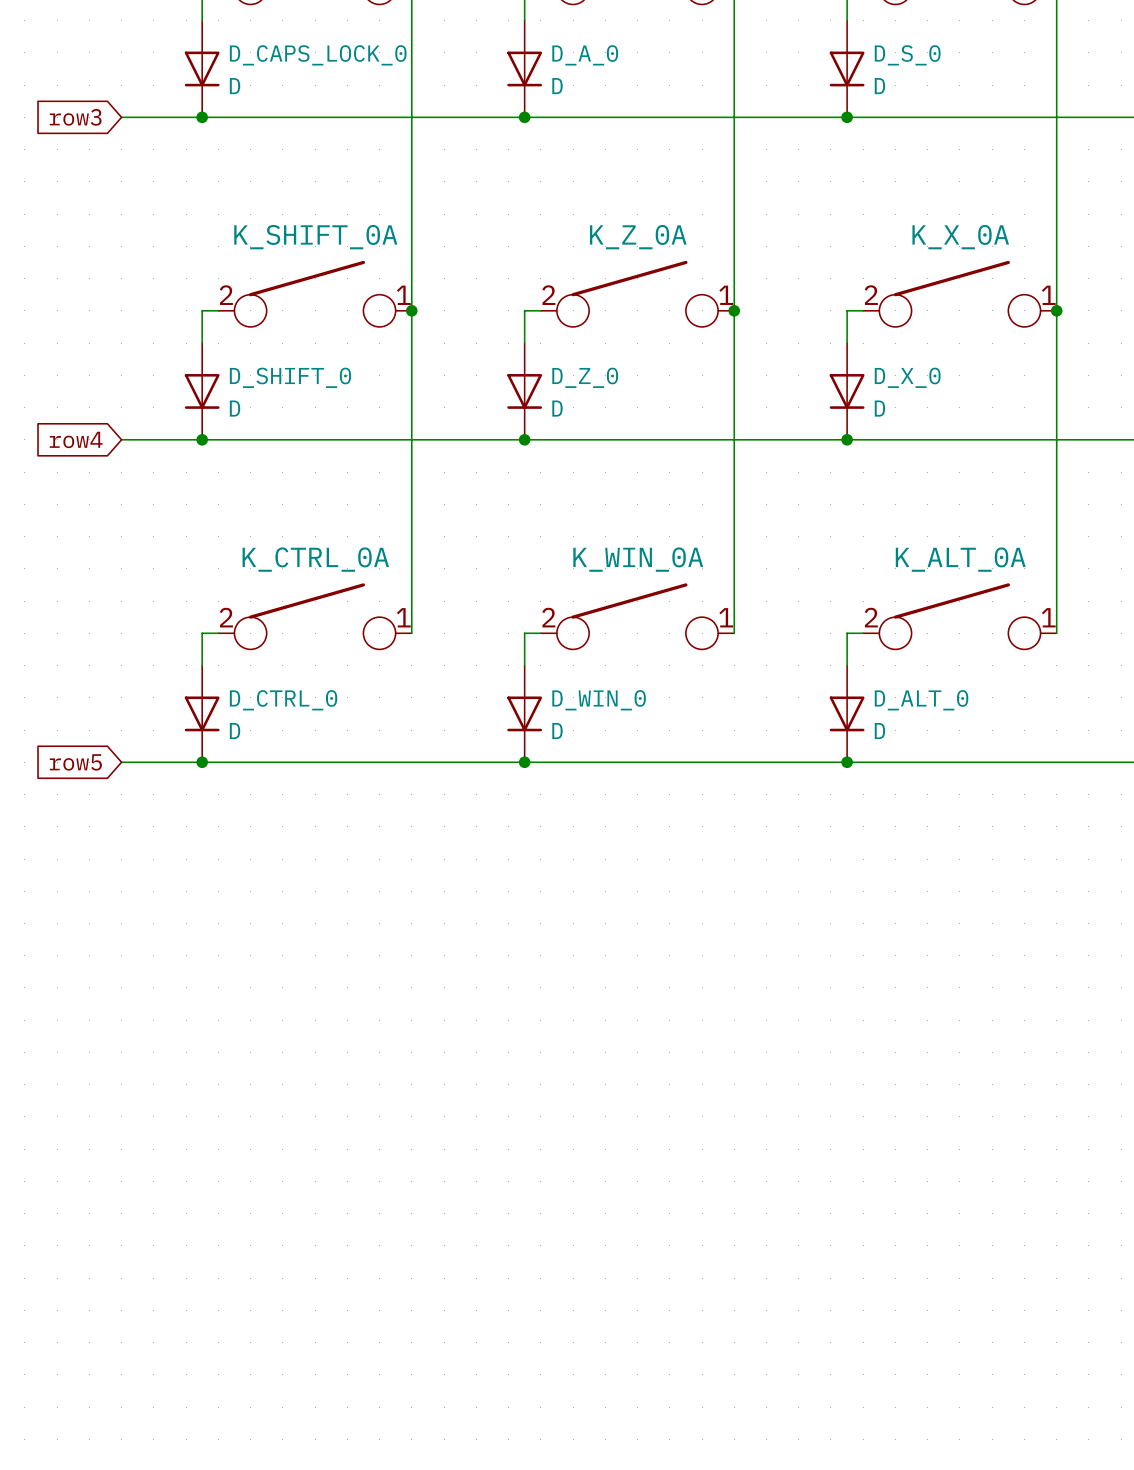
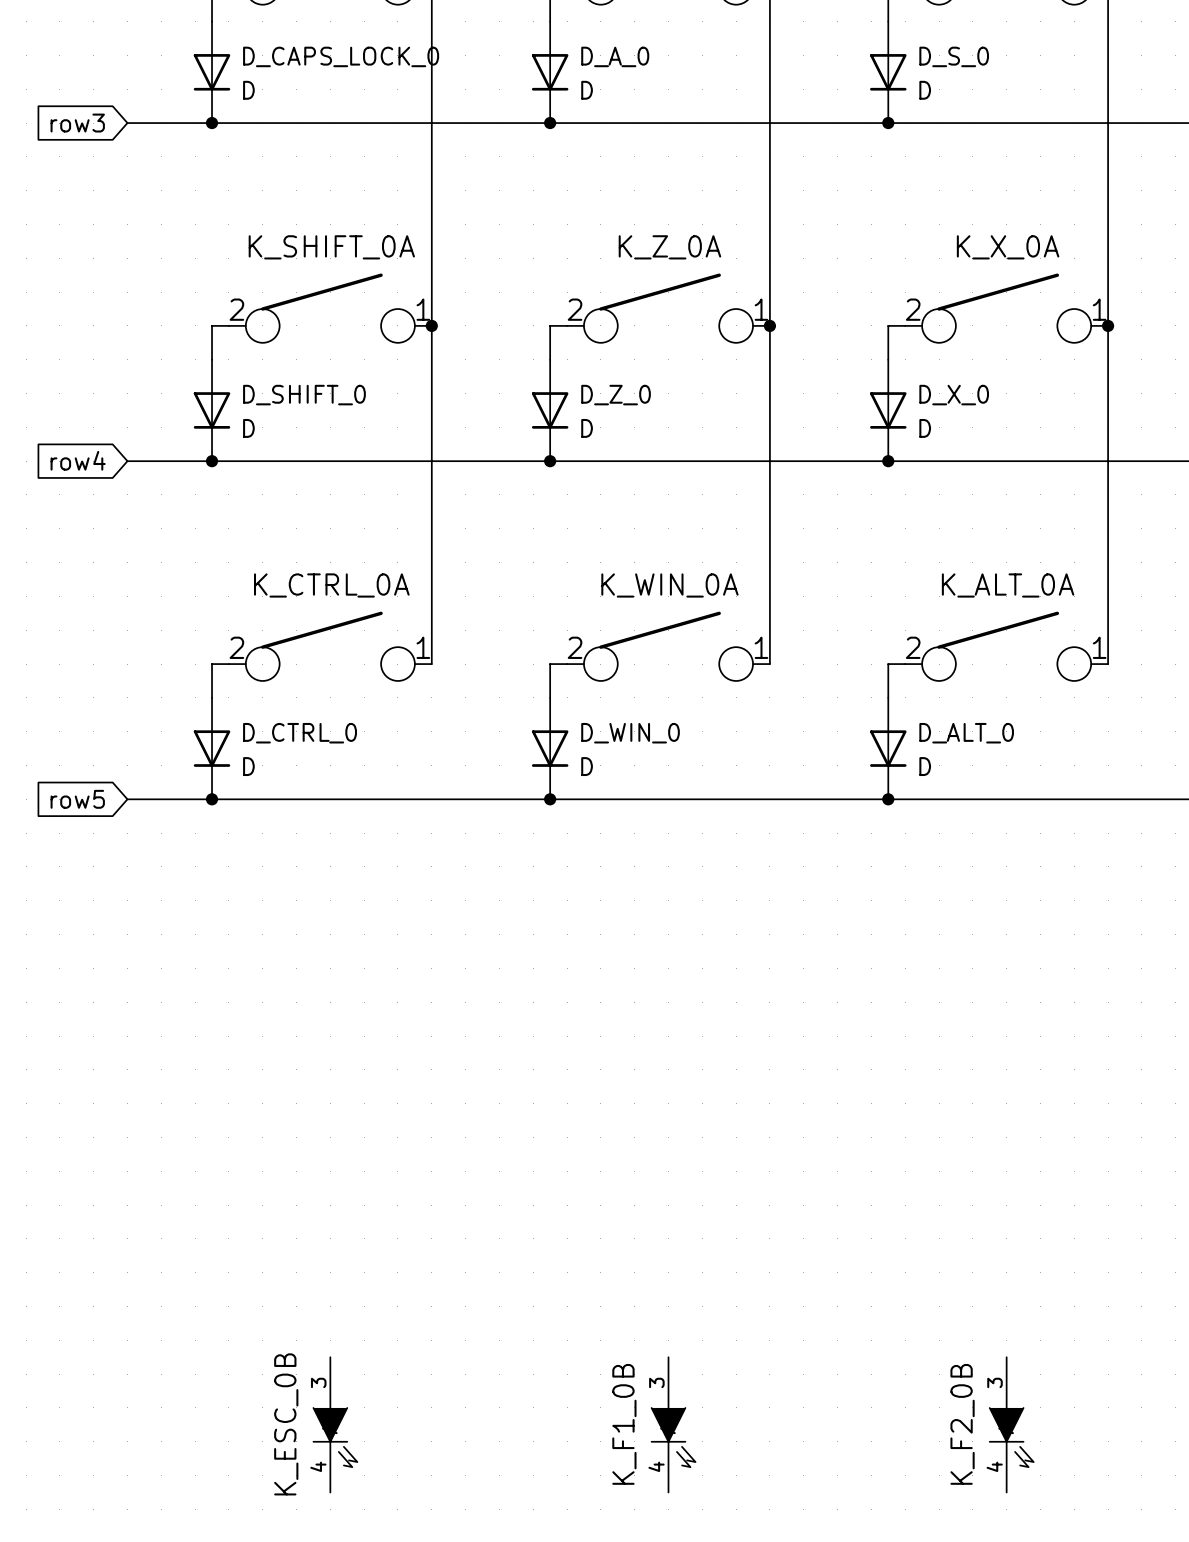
K_ESC_0B: none -> (335, 1424)
K_F1_0B: none -> (673, 1424)
K_F2_0B: none -> (1011, 1424)

